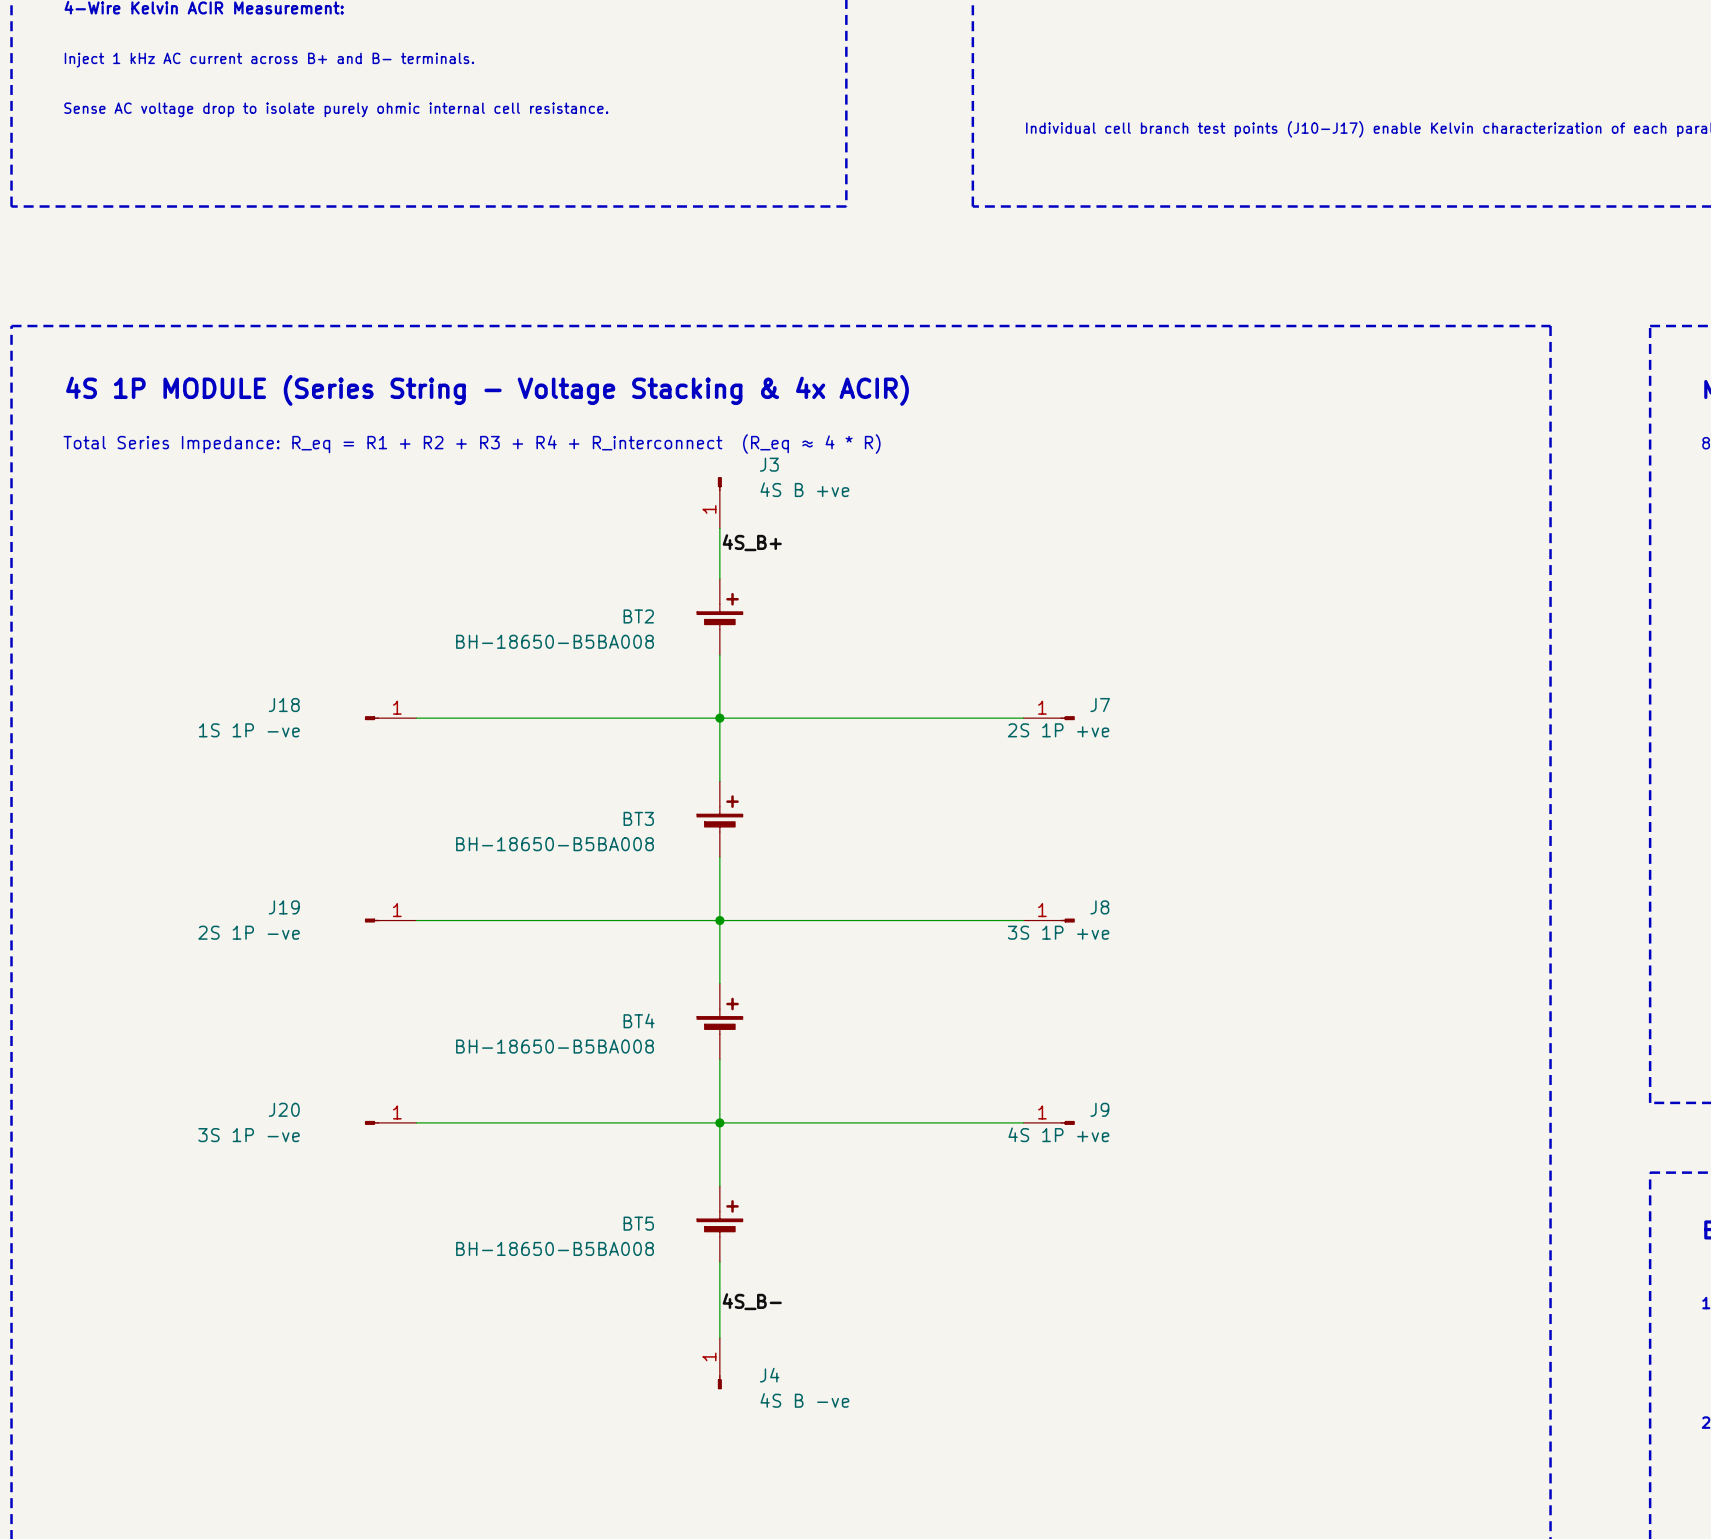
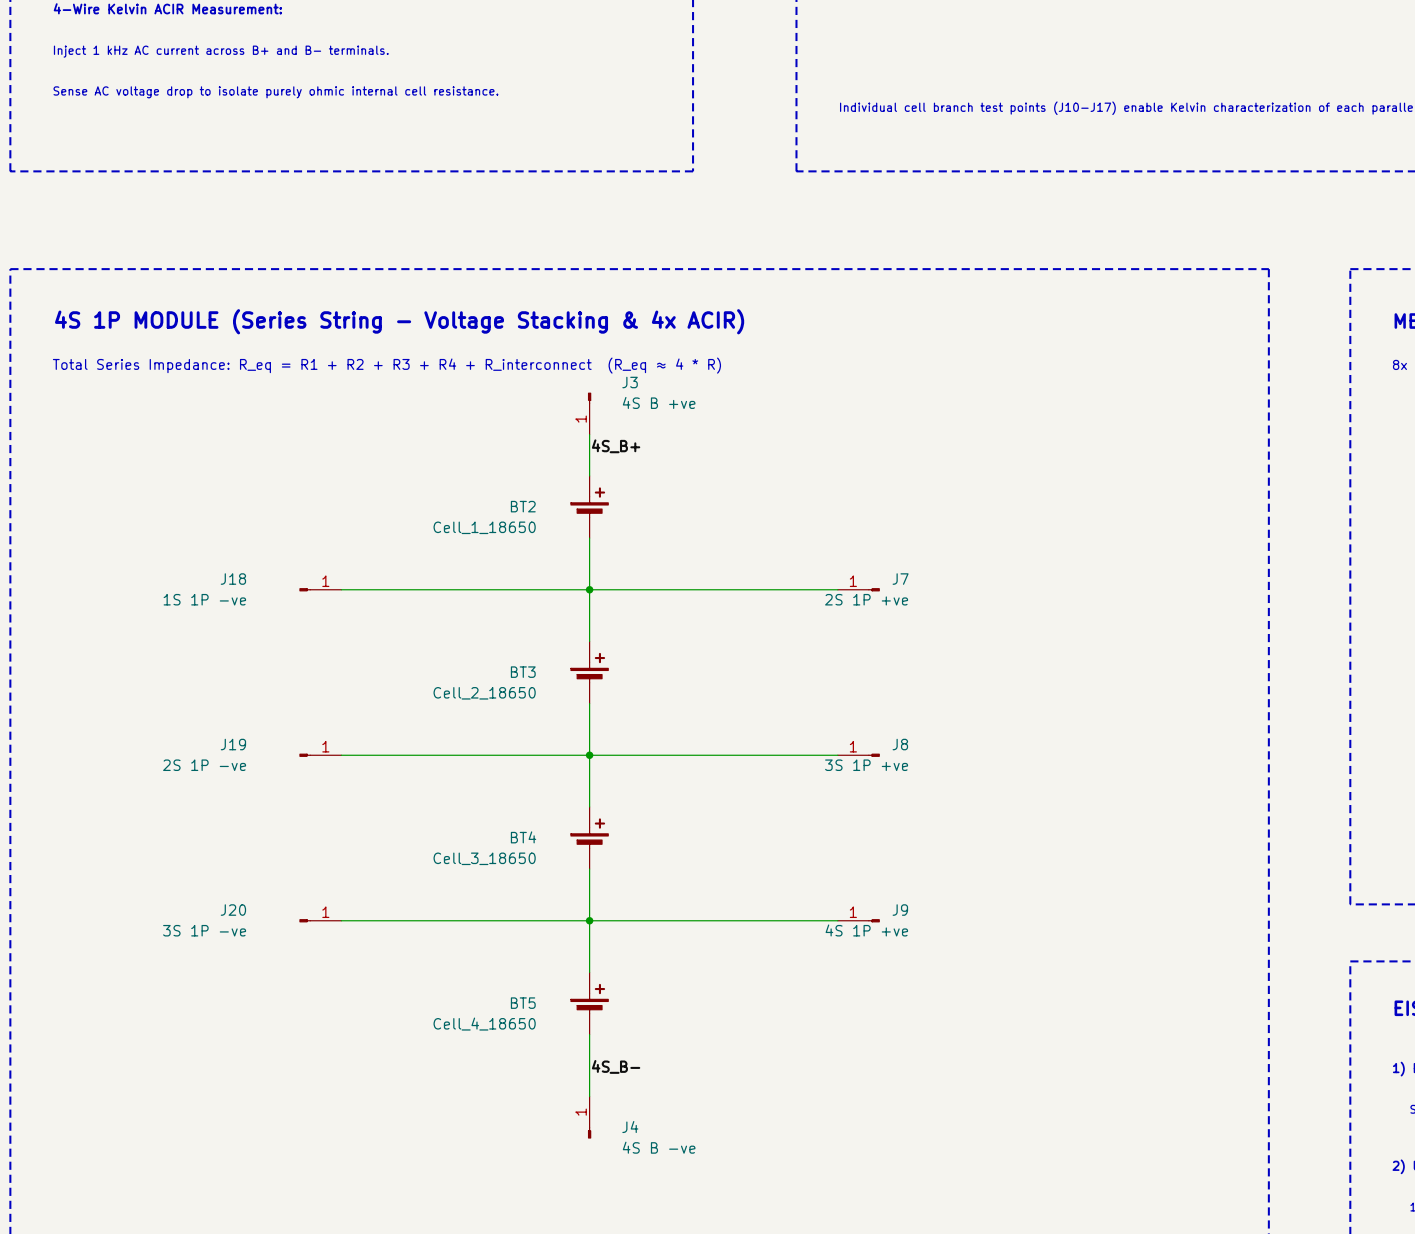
BT2 value: BH-18650-B5BA008 (555, 641) -> Cell_1_18650 (484, 527)
BT3 value: BH-18650-B5BA008 (555, 844) -> Cell_2_18650 (484, 693)
BT4 value: BH-18650-B5BA008 (555, 1046) -> Cell_3_18650 (484, 858)
BT5 value: BH-18650-B5BA008 (555, 1248) -> Cell_4_18650 (484, 1024)

